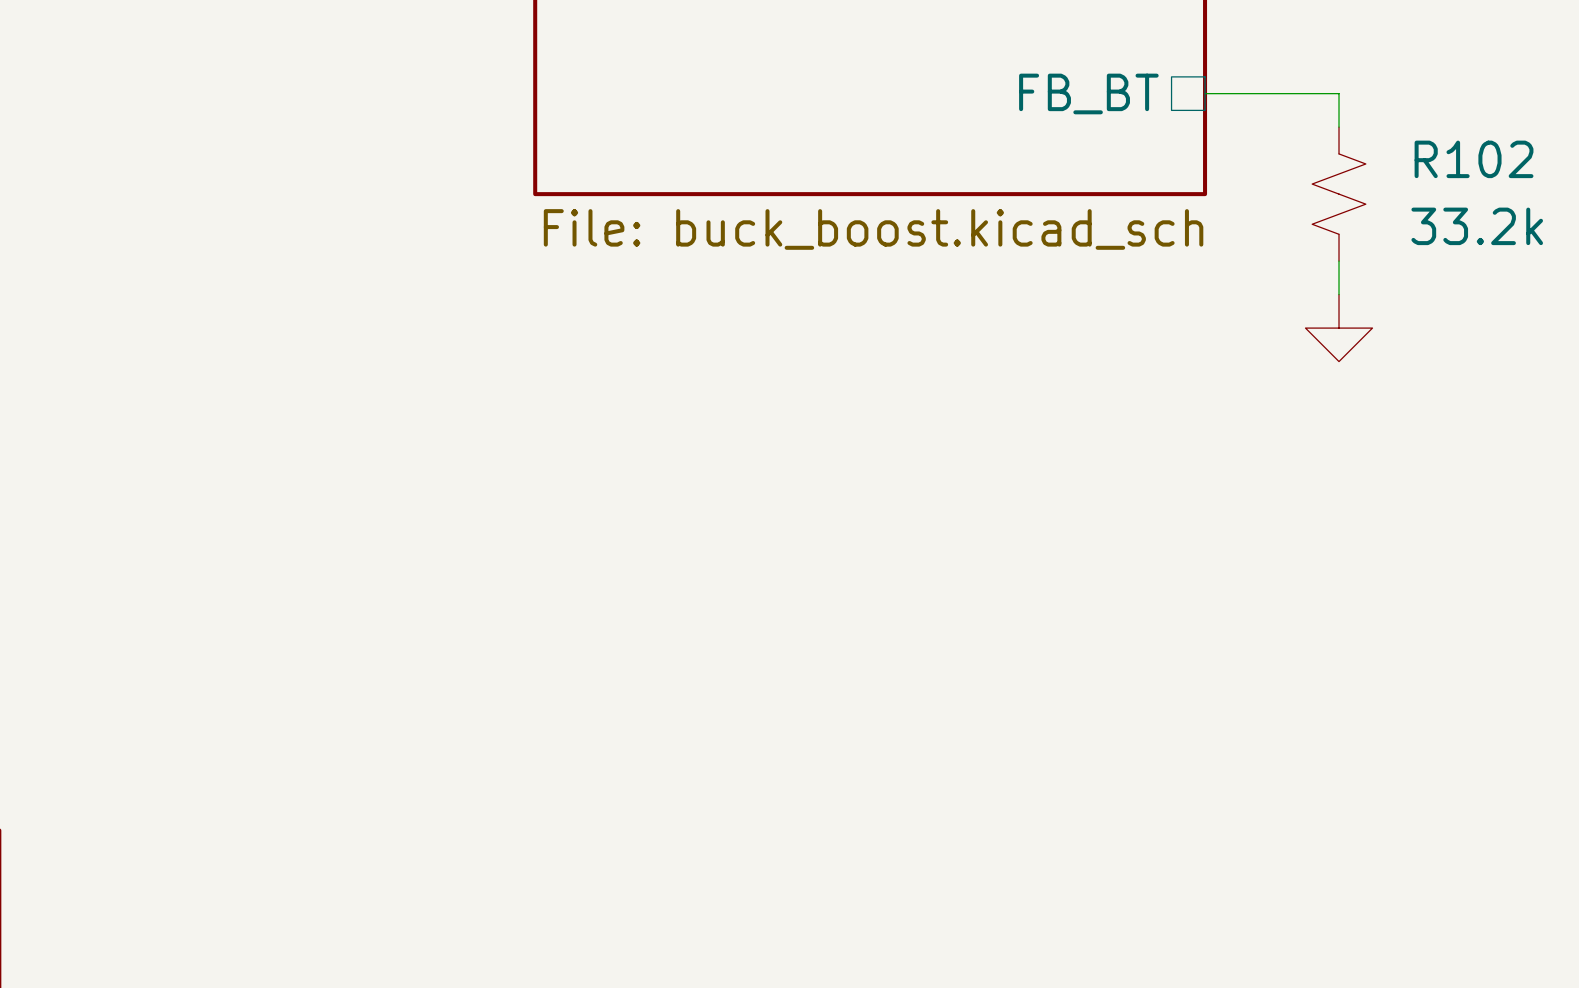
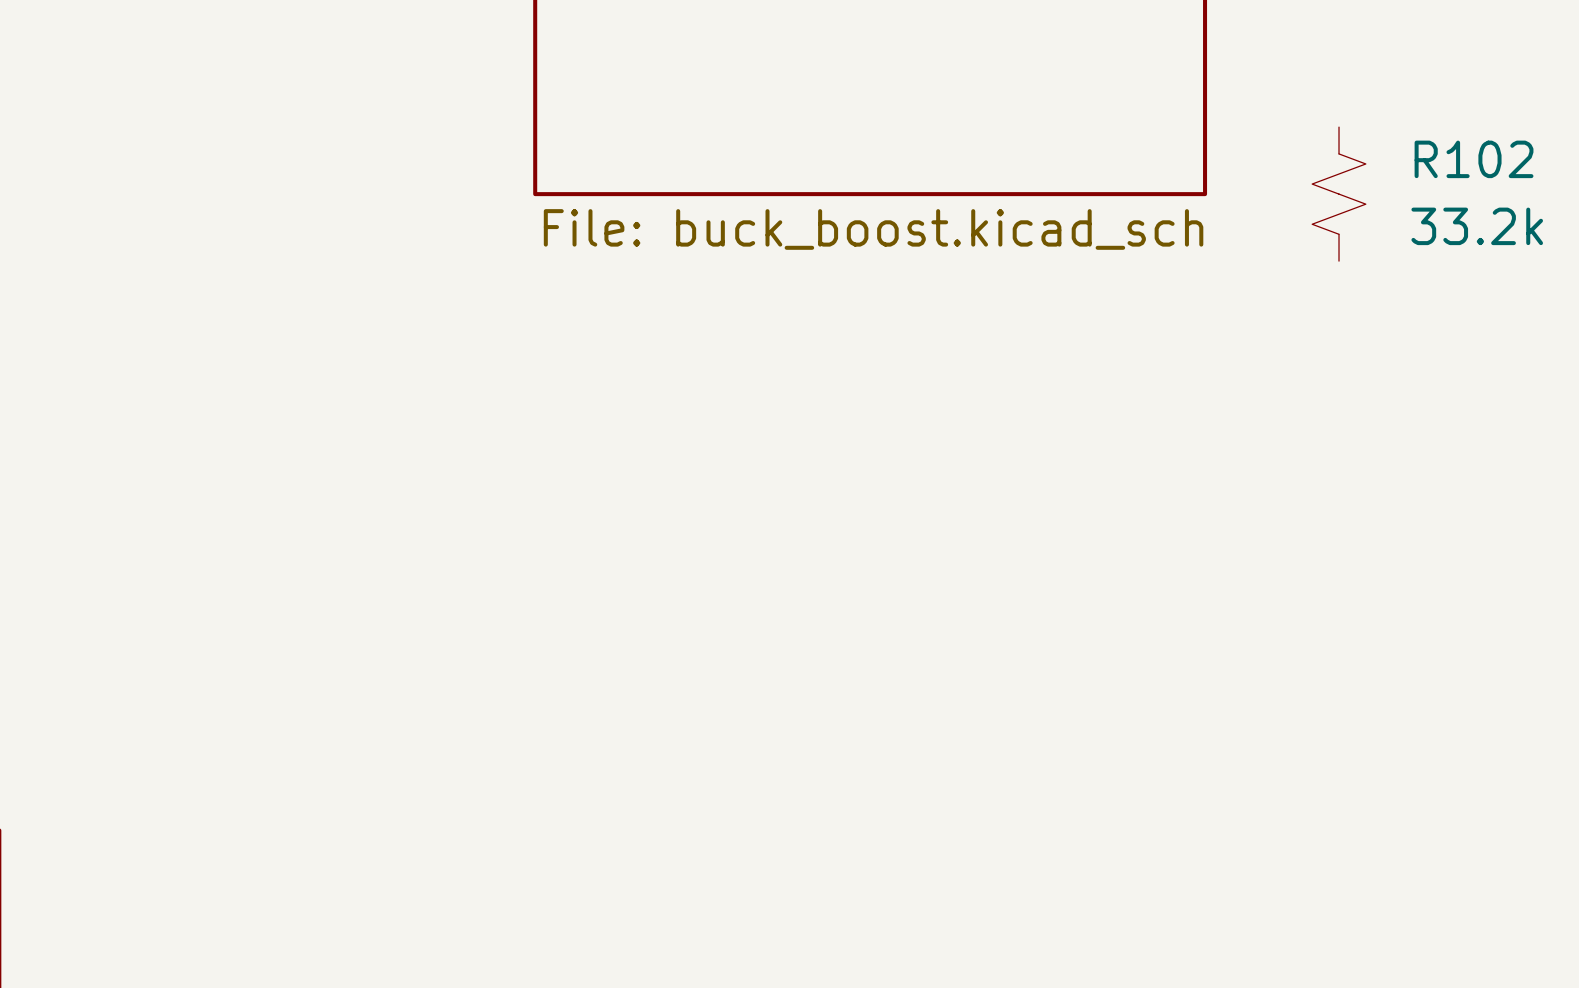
sheet pin: FB_BT (1088, 93) -> none
wire: (1205, 93) (1339, 93) (1339, 127) -> none
wire: (1339, 261) (1339, 294) -> none
power symbol: (1339, 328) -> none

